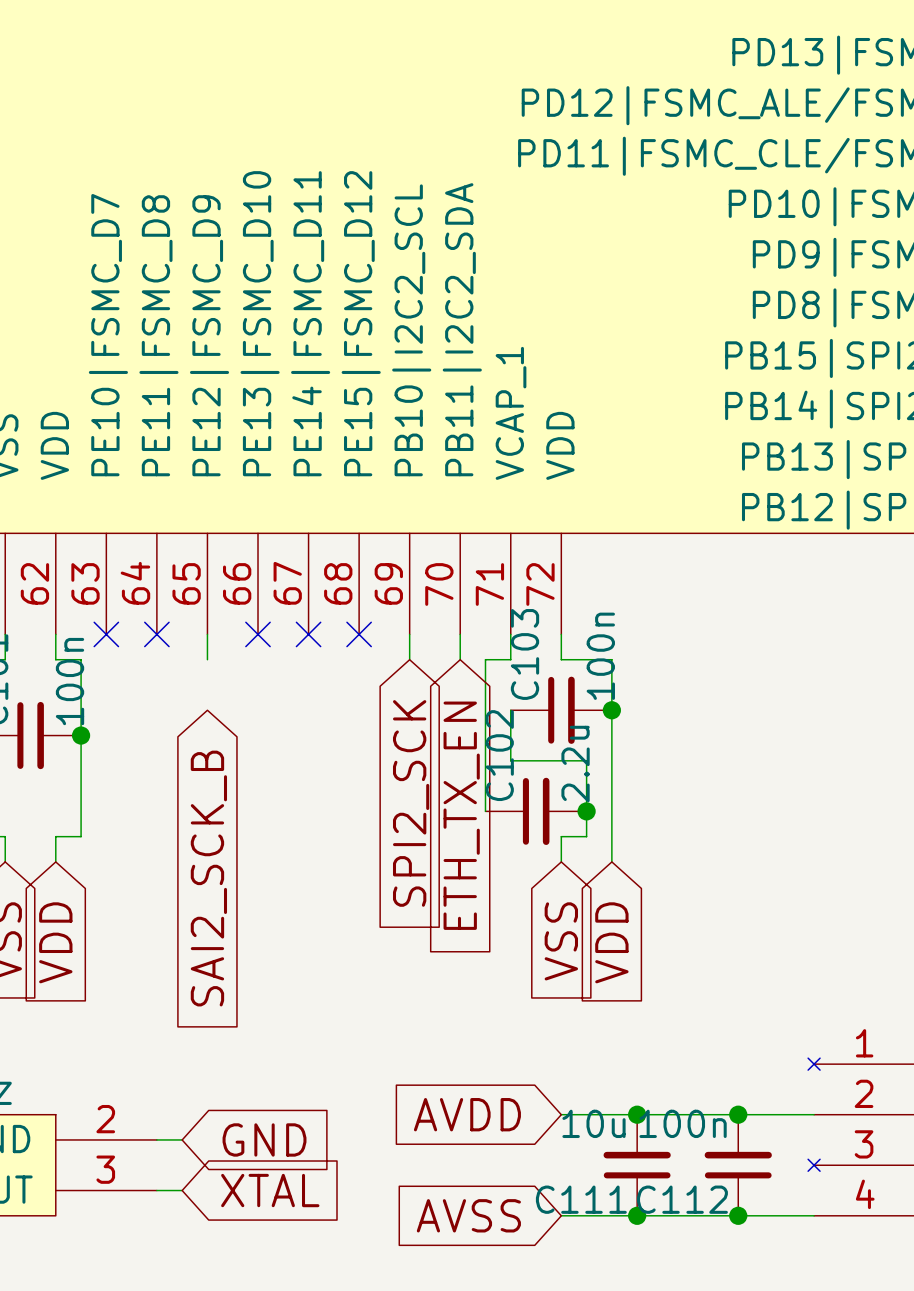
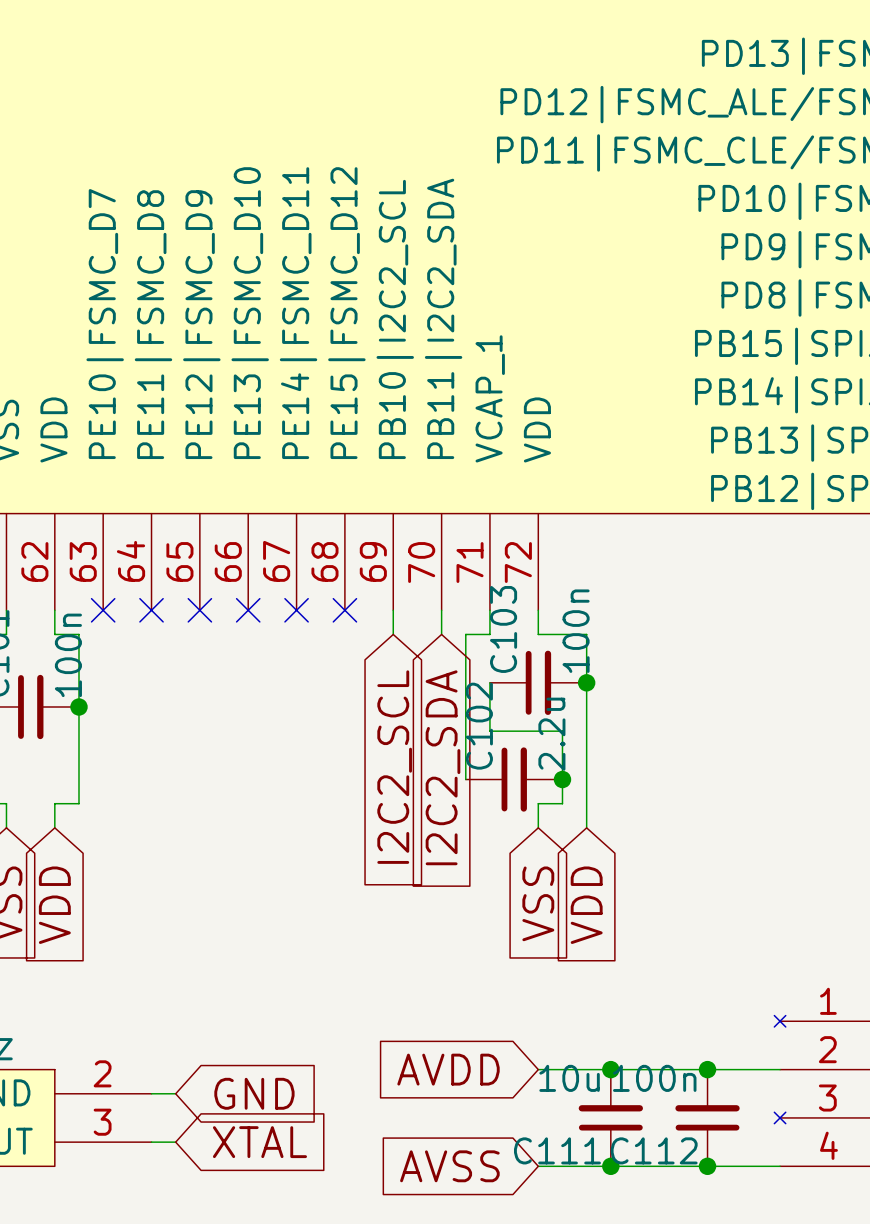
wire: (207, 634) (207, 659) -> none
no-connect mark: none -> (199, 610)
global label: SPI2_SCK (411, 803) -> I2C2_SCL (394, 767)
global label: ETH_TX_EN (461, 815) -> I2C2_SDA (442, 767)
global label: SAI2_SCK_B (208, 878) -> none

